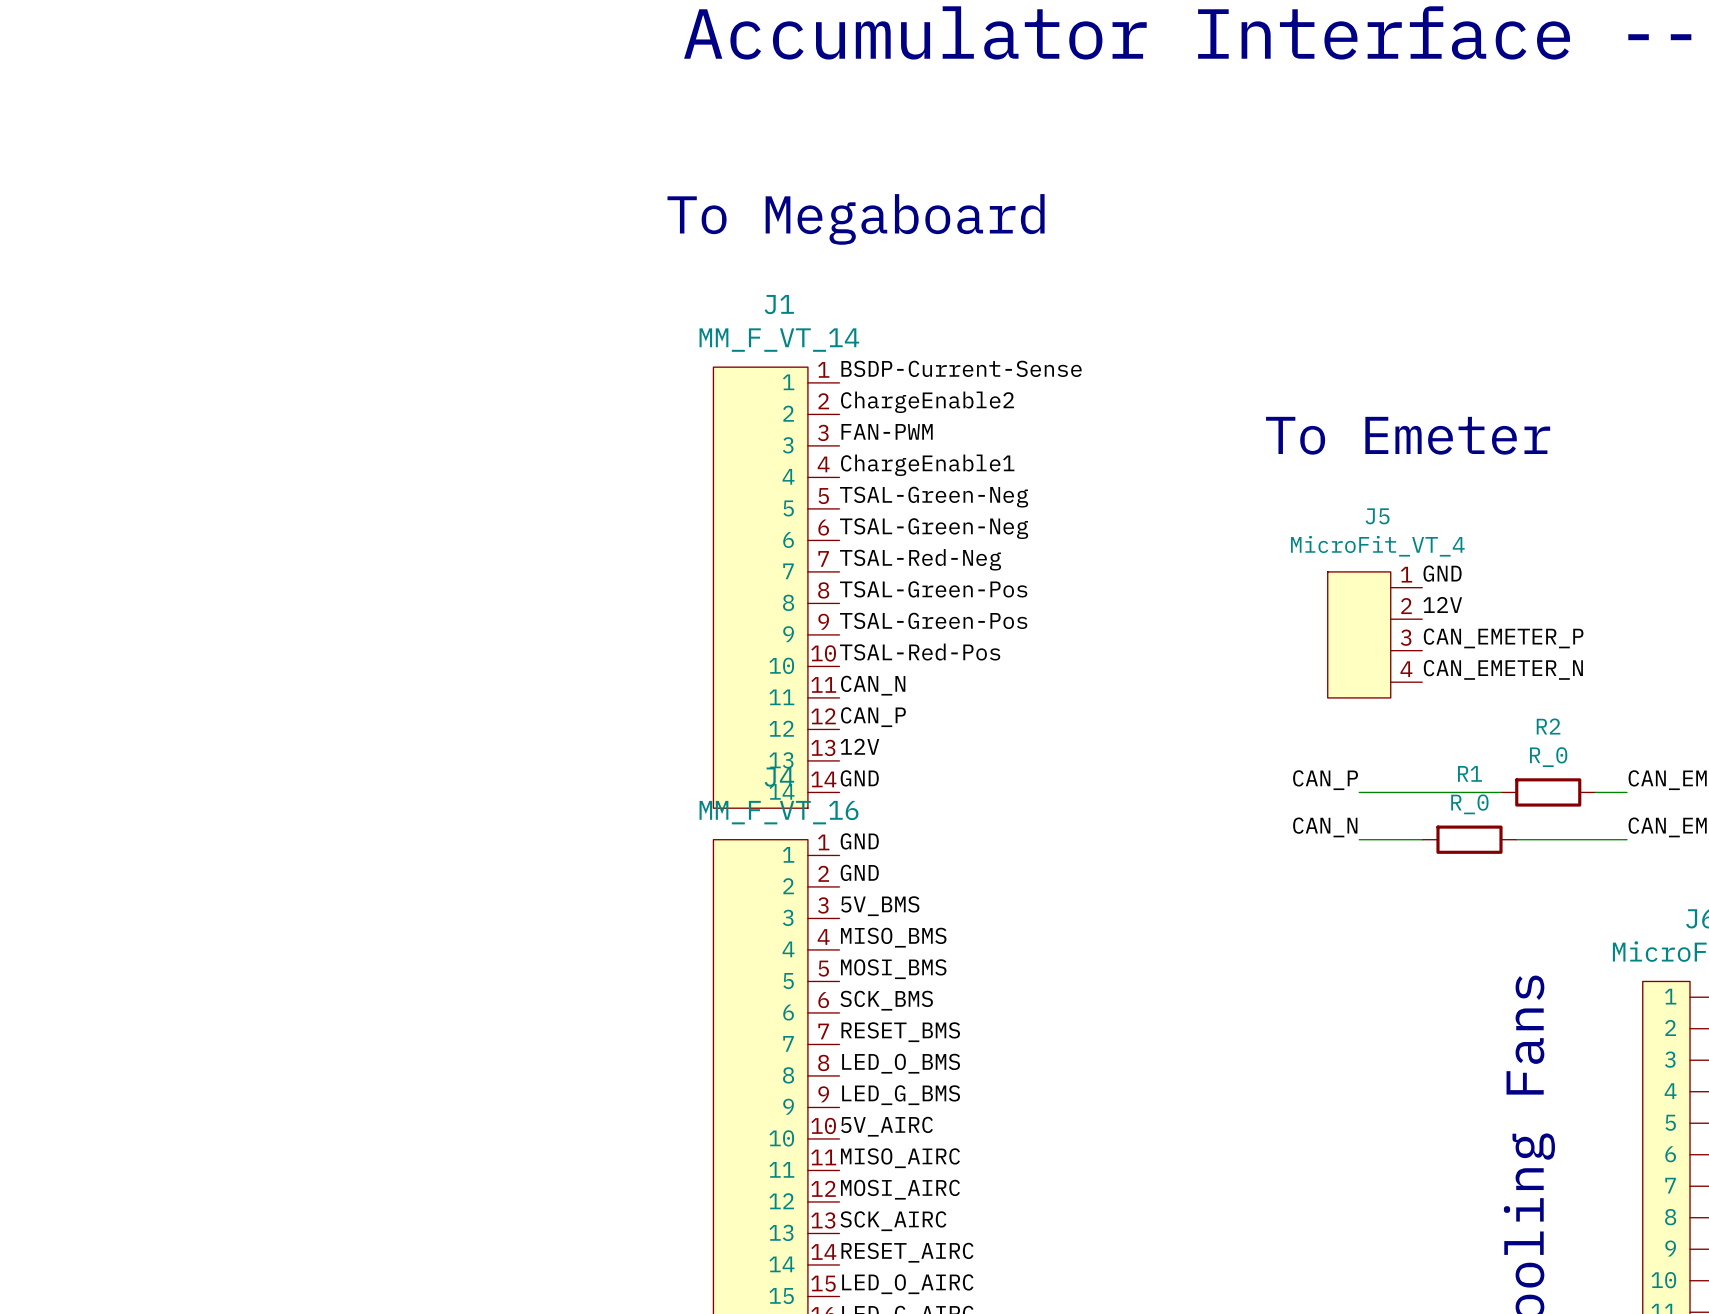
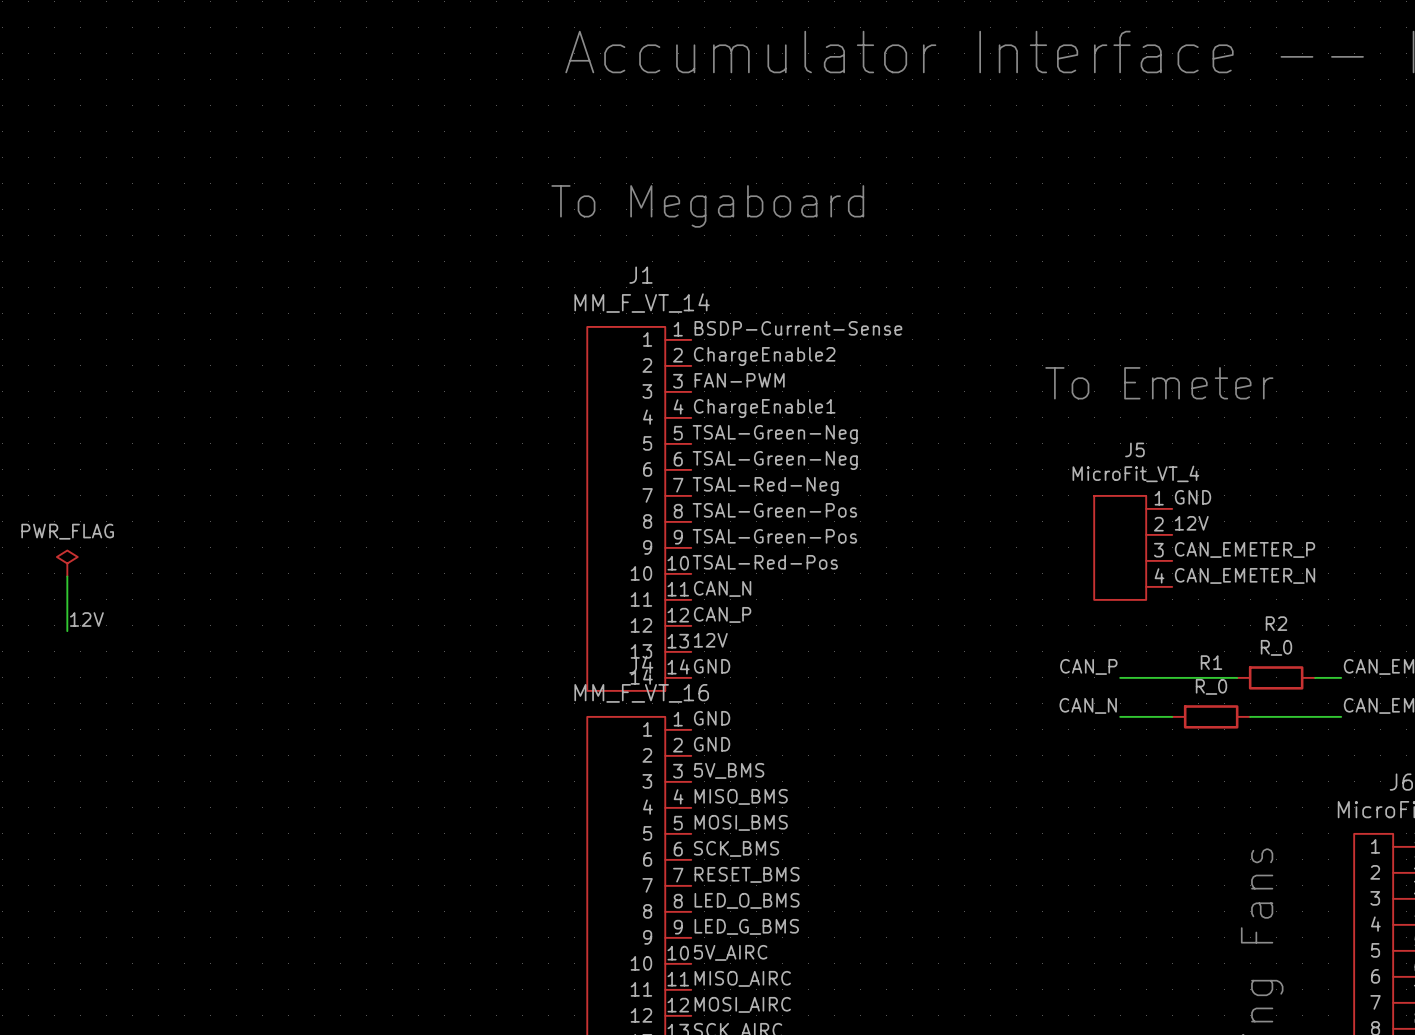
power symbol: none -> PWR_FLAG (67, 563)
wire: none -> (67, 576) (67, 631)
label: none -> 12V (86, 619)

